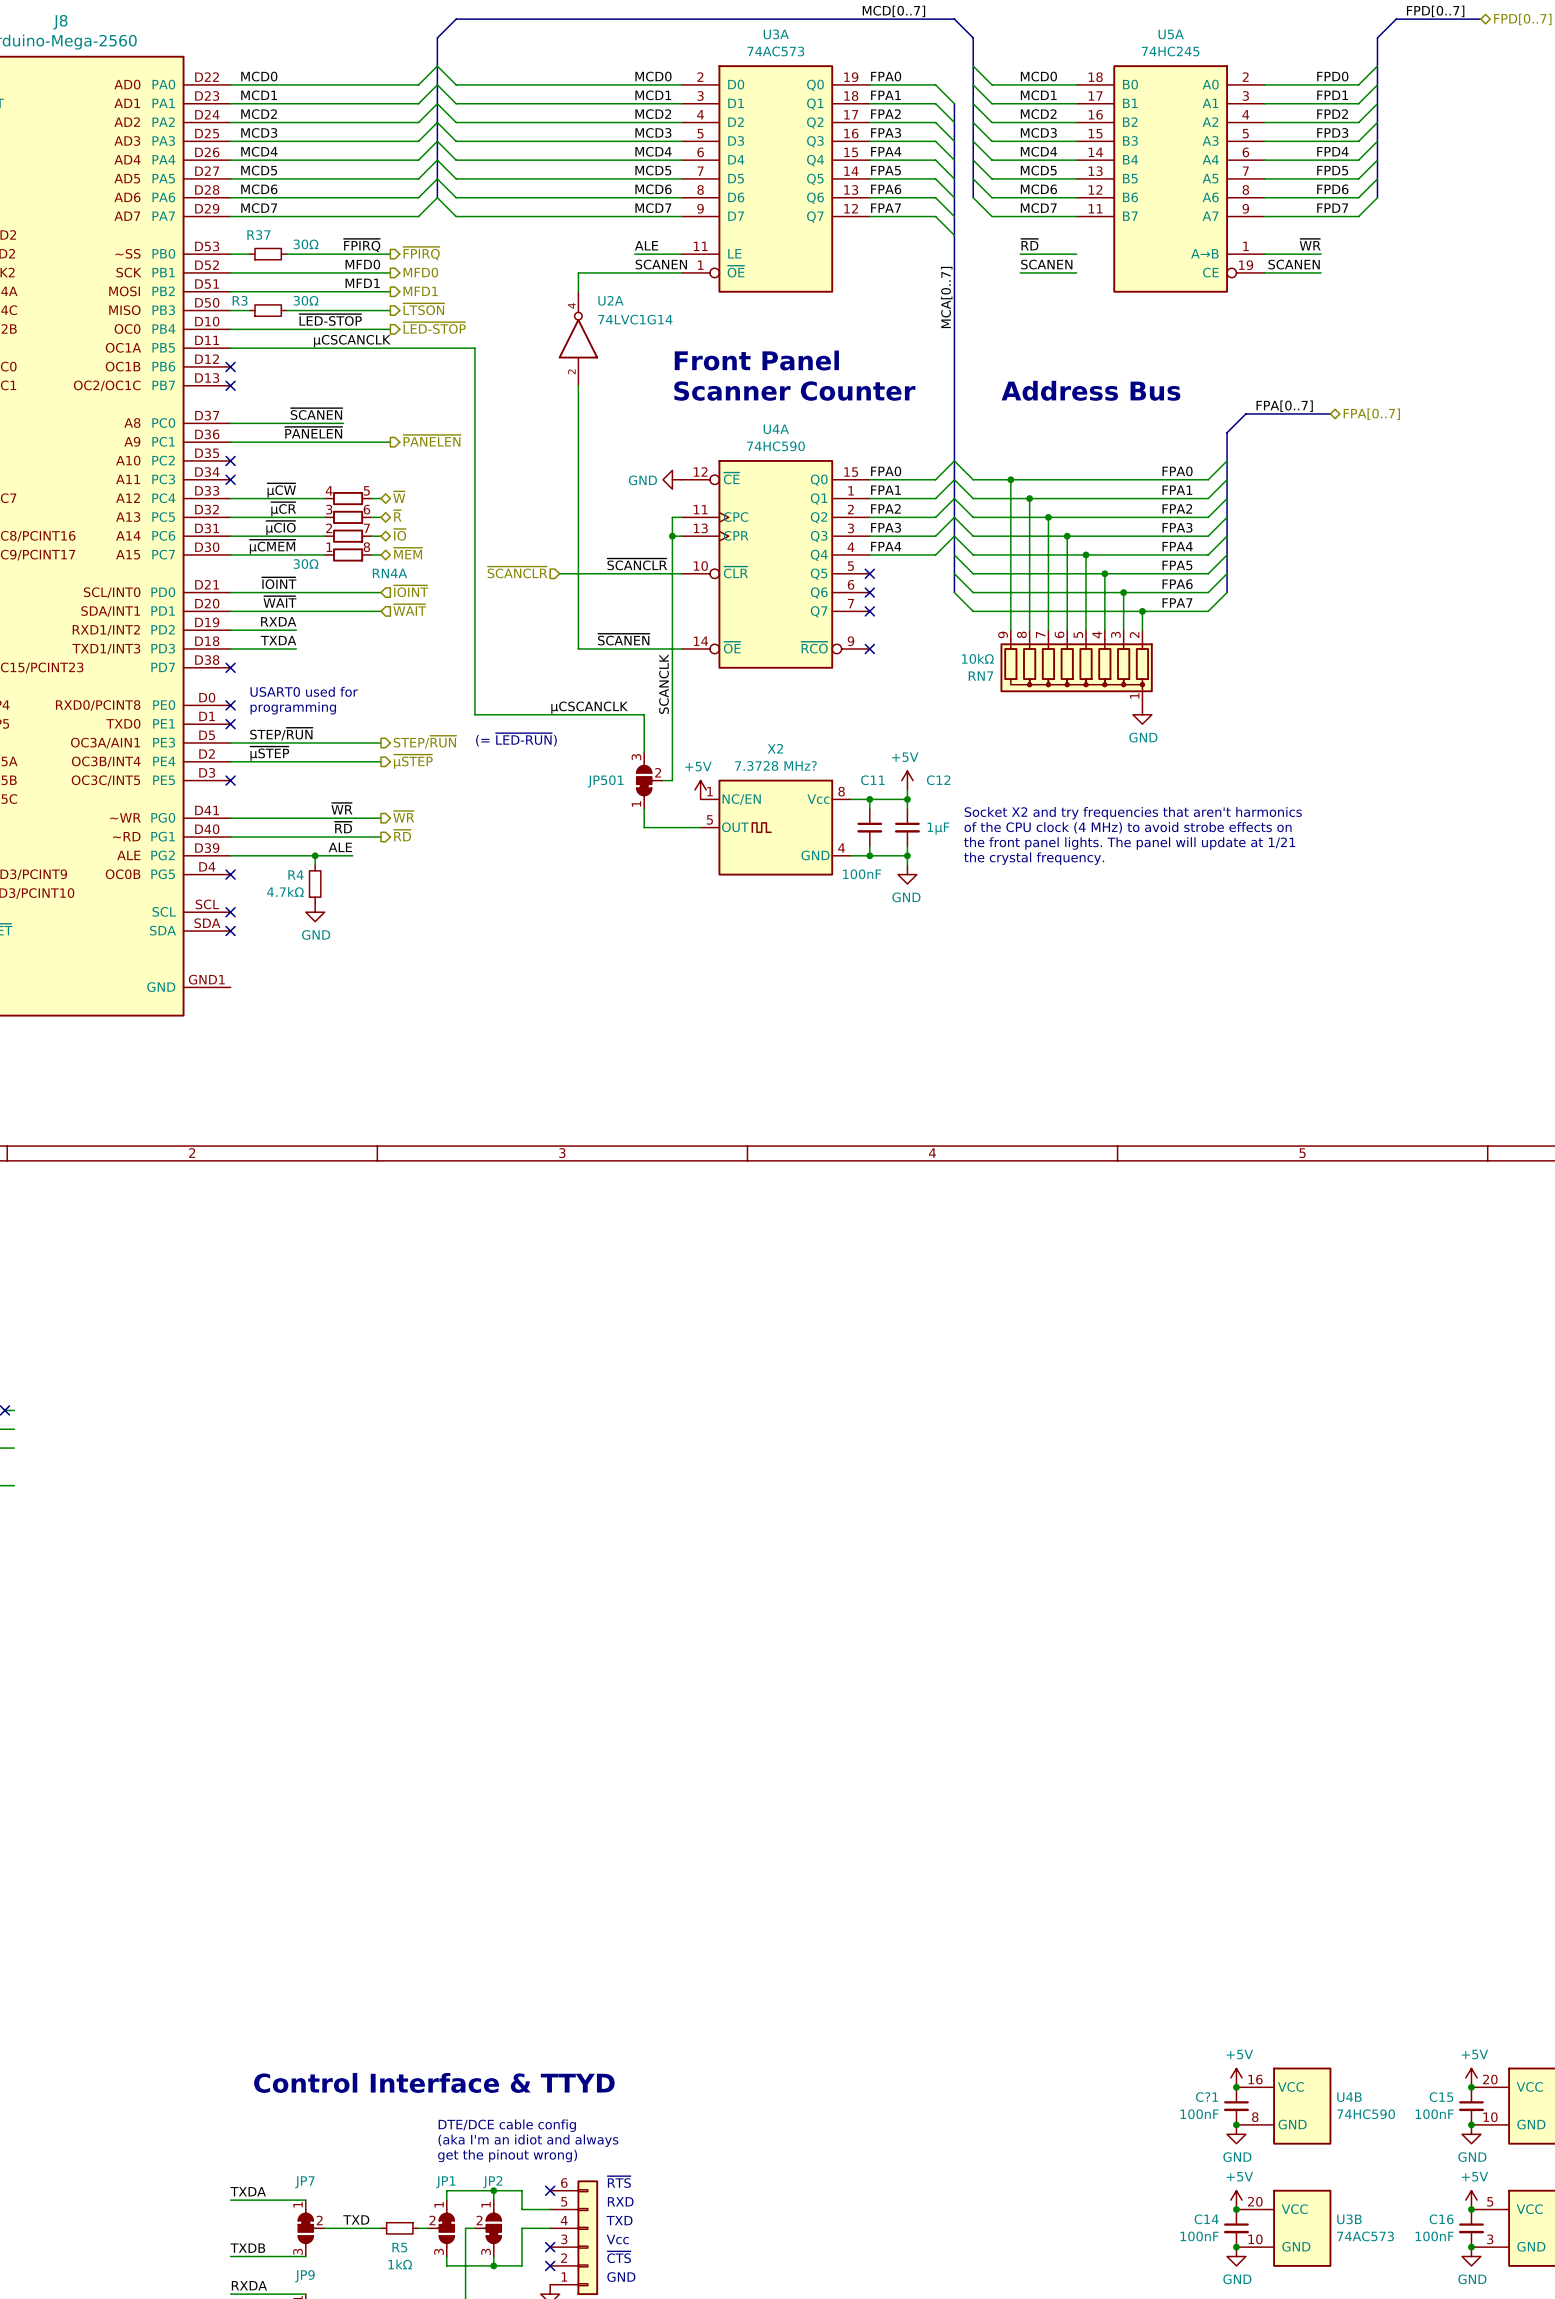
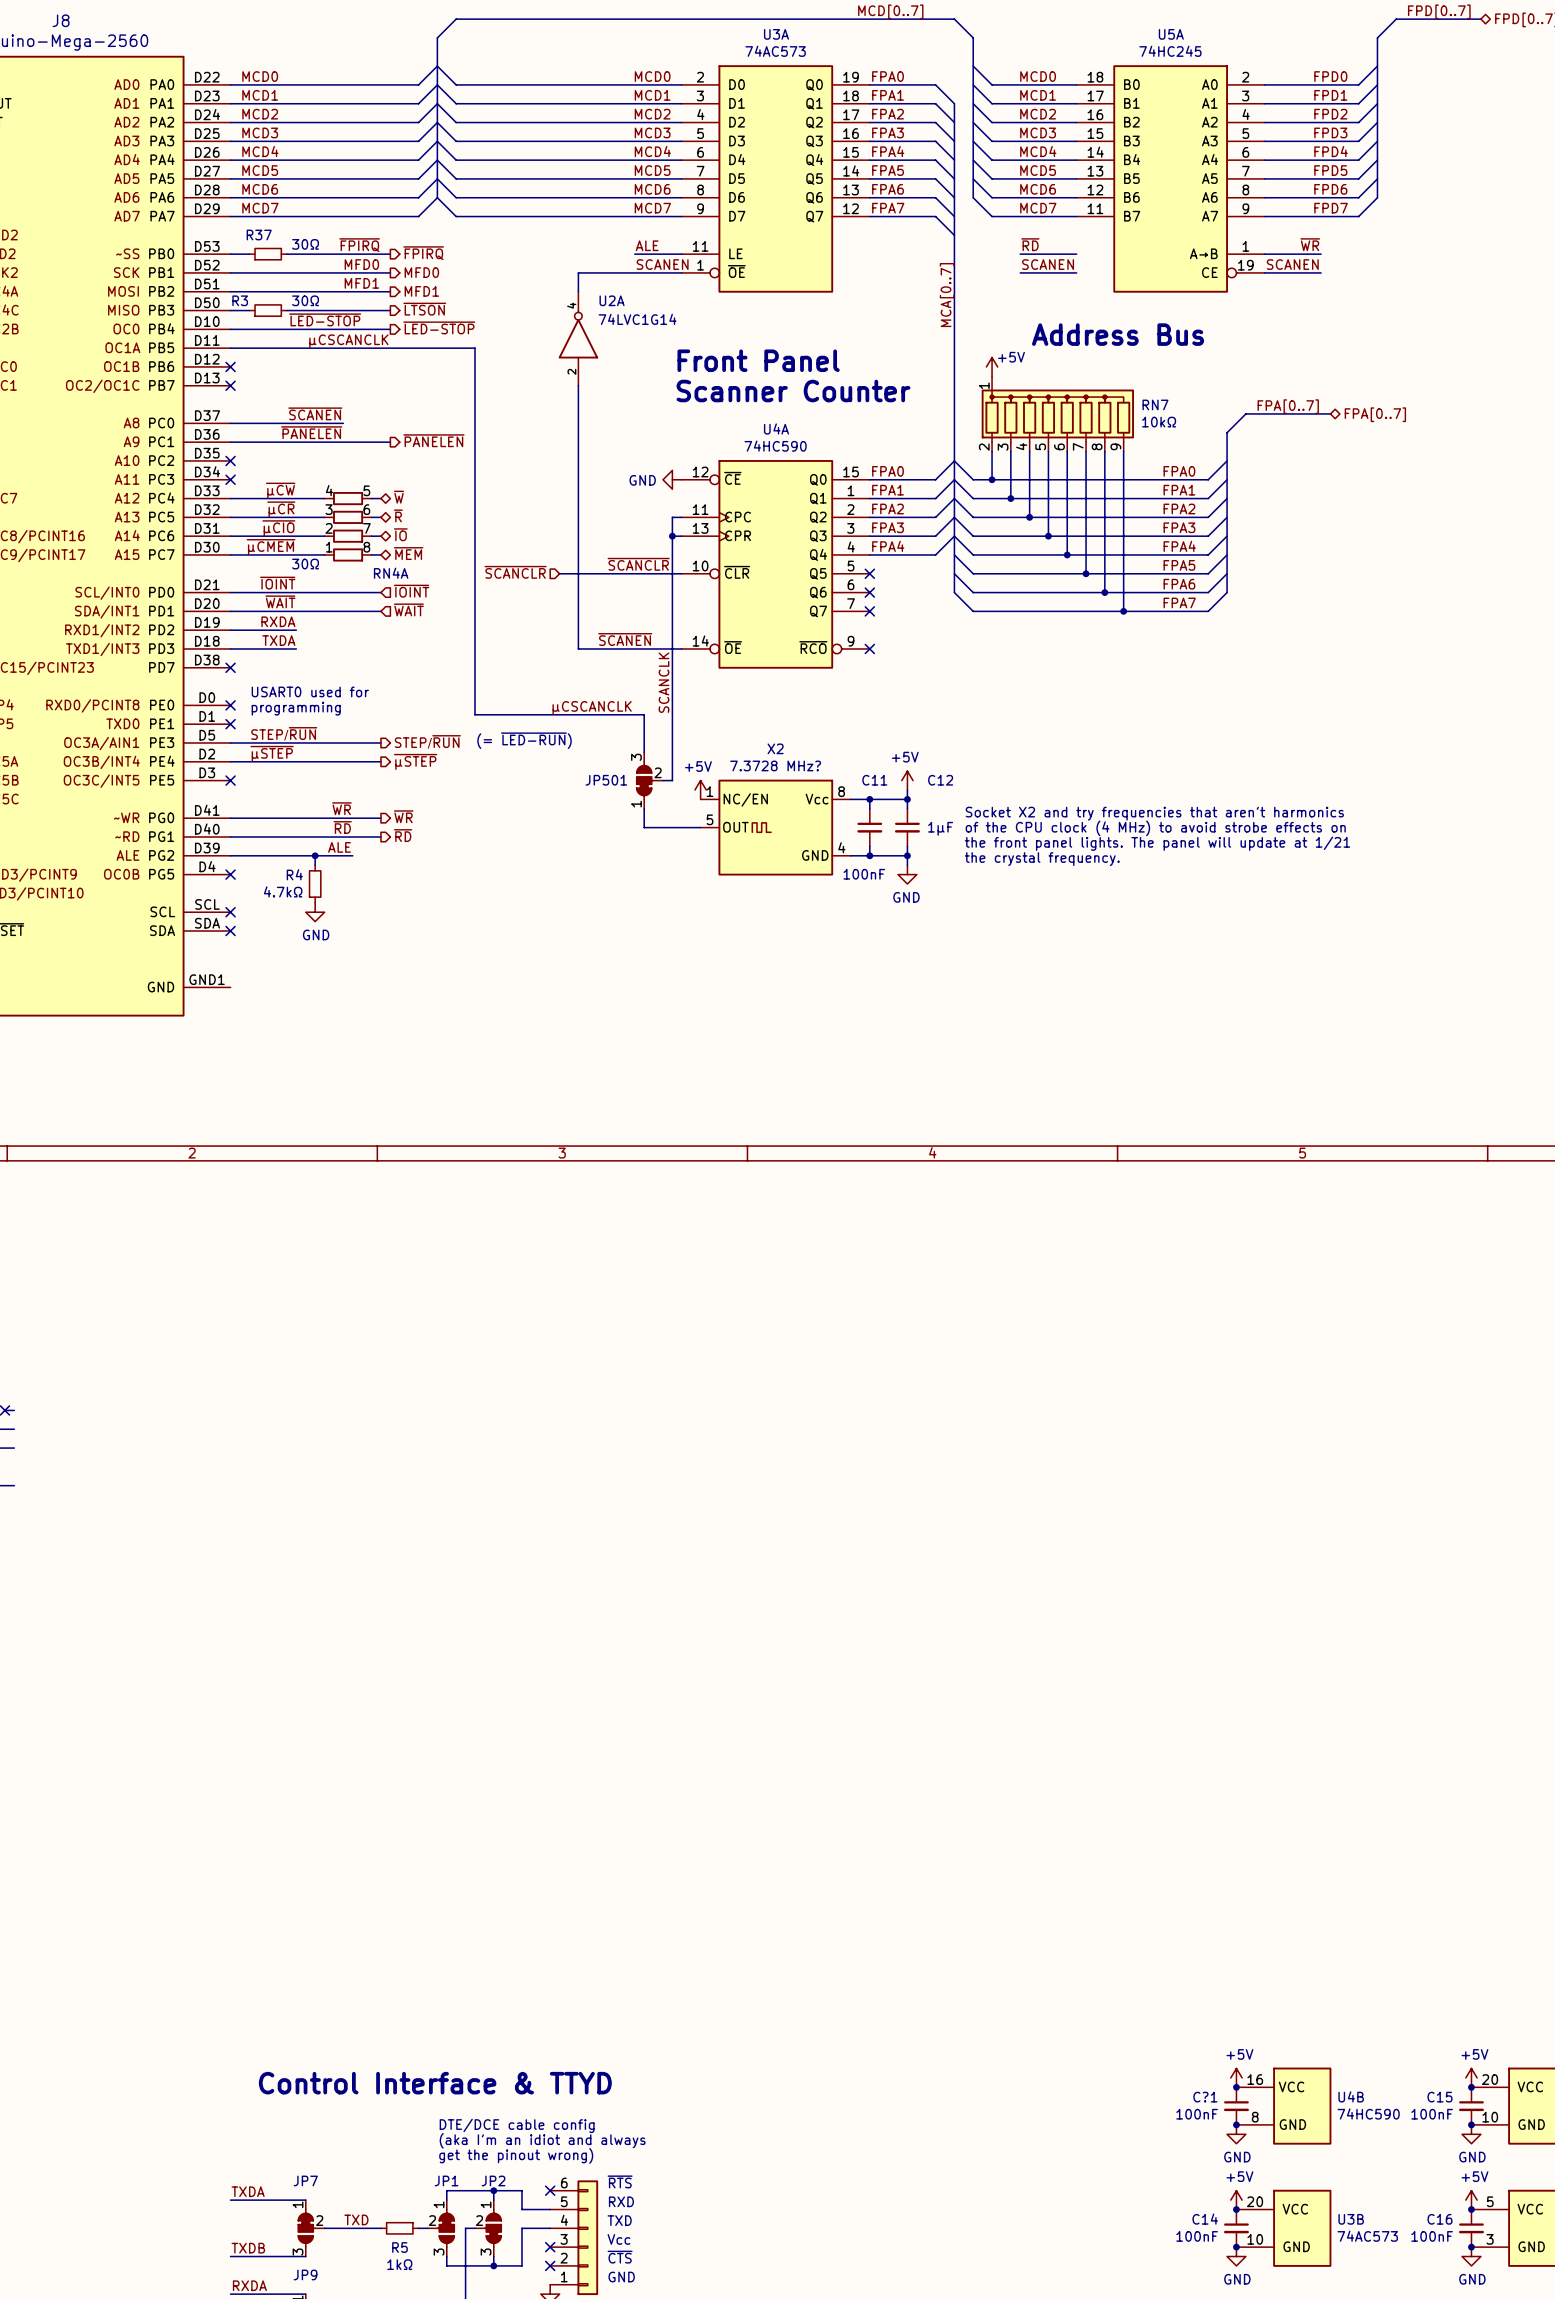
power symbol: none -> +5V (992, 366)
text position: Address Bus (1090, 390) -> Address Bus (1118, 334)
wire: none -> (992, 451) (992, 479)
wire: none -> (1010, 451) (1010, 479)
wire: none -> (1029, 451) (1029, 498)
wire: none -> (1048, 451) (1048, 517)
wire: none -> (1067, 451) (1067, 536)
wire: none -> (1086, 451) (1086, 554)
wire: none -> (1104, 451) (1104, 573)
wire: none -> (1123, 451) (1123, 592)
junction: none -> (992, 479)
junction: (1010, 479) -> none
wire: (1010, 498) (1010, 630) -> none
junction: none -> (1010, 498)
junction: (1029, 498) -> none
wire: (1029, 517) (1029, 630) -> none
junction: none -> (1029, 517)
junction: (1048, 517) -> none
wire: (1048, 536) (1048, 630) -> none
junction: none -> (1048, 536)
junction: (1067, 536) -> none
wire: (1067, 554) (1067, 630) -> none
junction: none -> (1067, 554)
junction: (1086, 554) -> none
wire: (1086, 573) (1086, 630) -> none
junction: none -> (1086, 573)
junction: (1104, 573) -> none
wire: (1104, 592) (1104, 630) -> none
junction: none -> (1104, 592)
junction: (1123, 592) -> none
wire: (1123, 611) (1123, 630) -> none
junction: none -> (1123, 611)
wire: (1142, 611) (1142, 630) -> none
junction: (1142, 611) -> none
RN7 rotation: 0° (1076, 665) -> 180° (1057, 415)
RN7 position: (1076, 667) -> (1057, 413)
power symbol: GND (1142, 714) -> none

